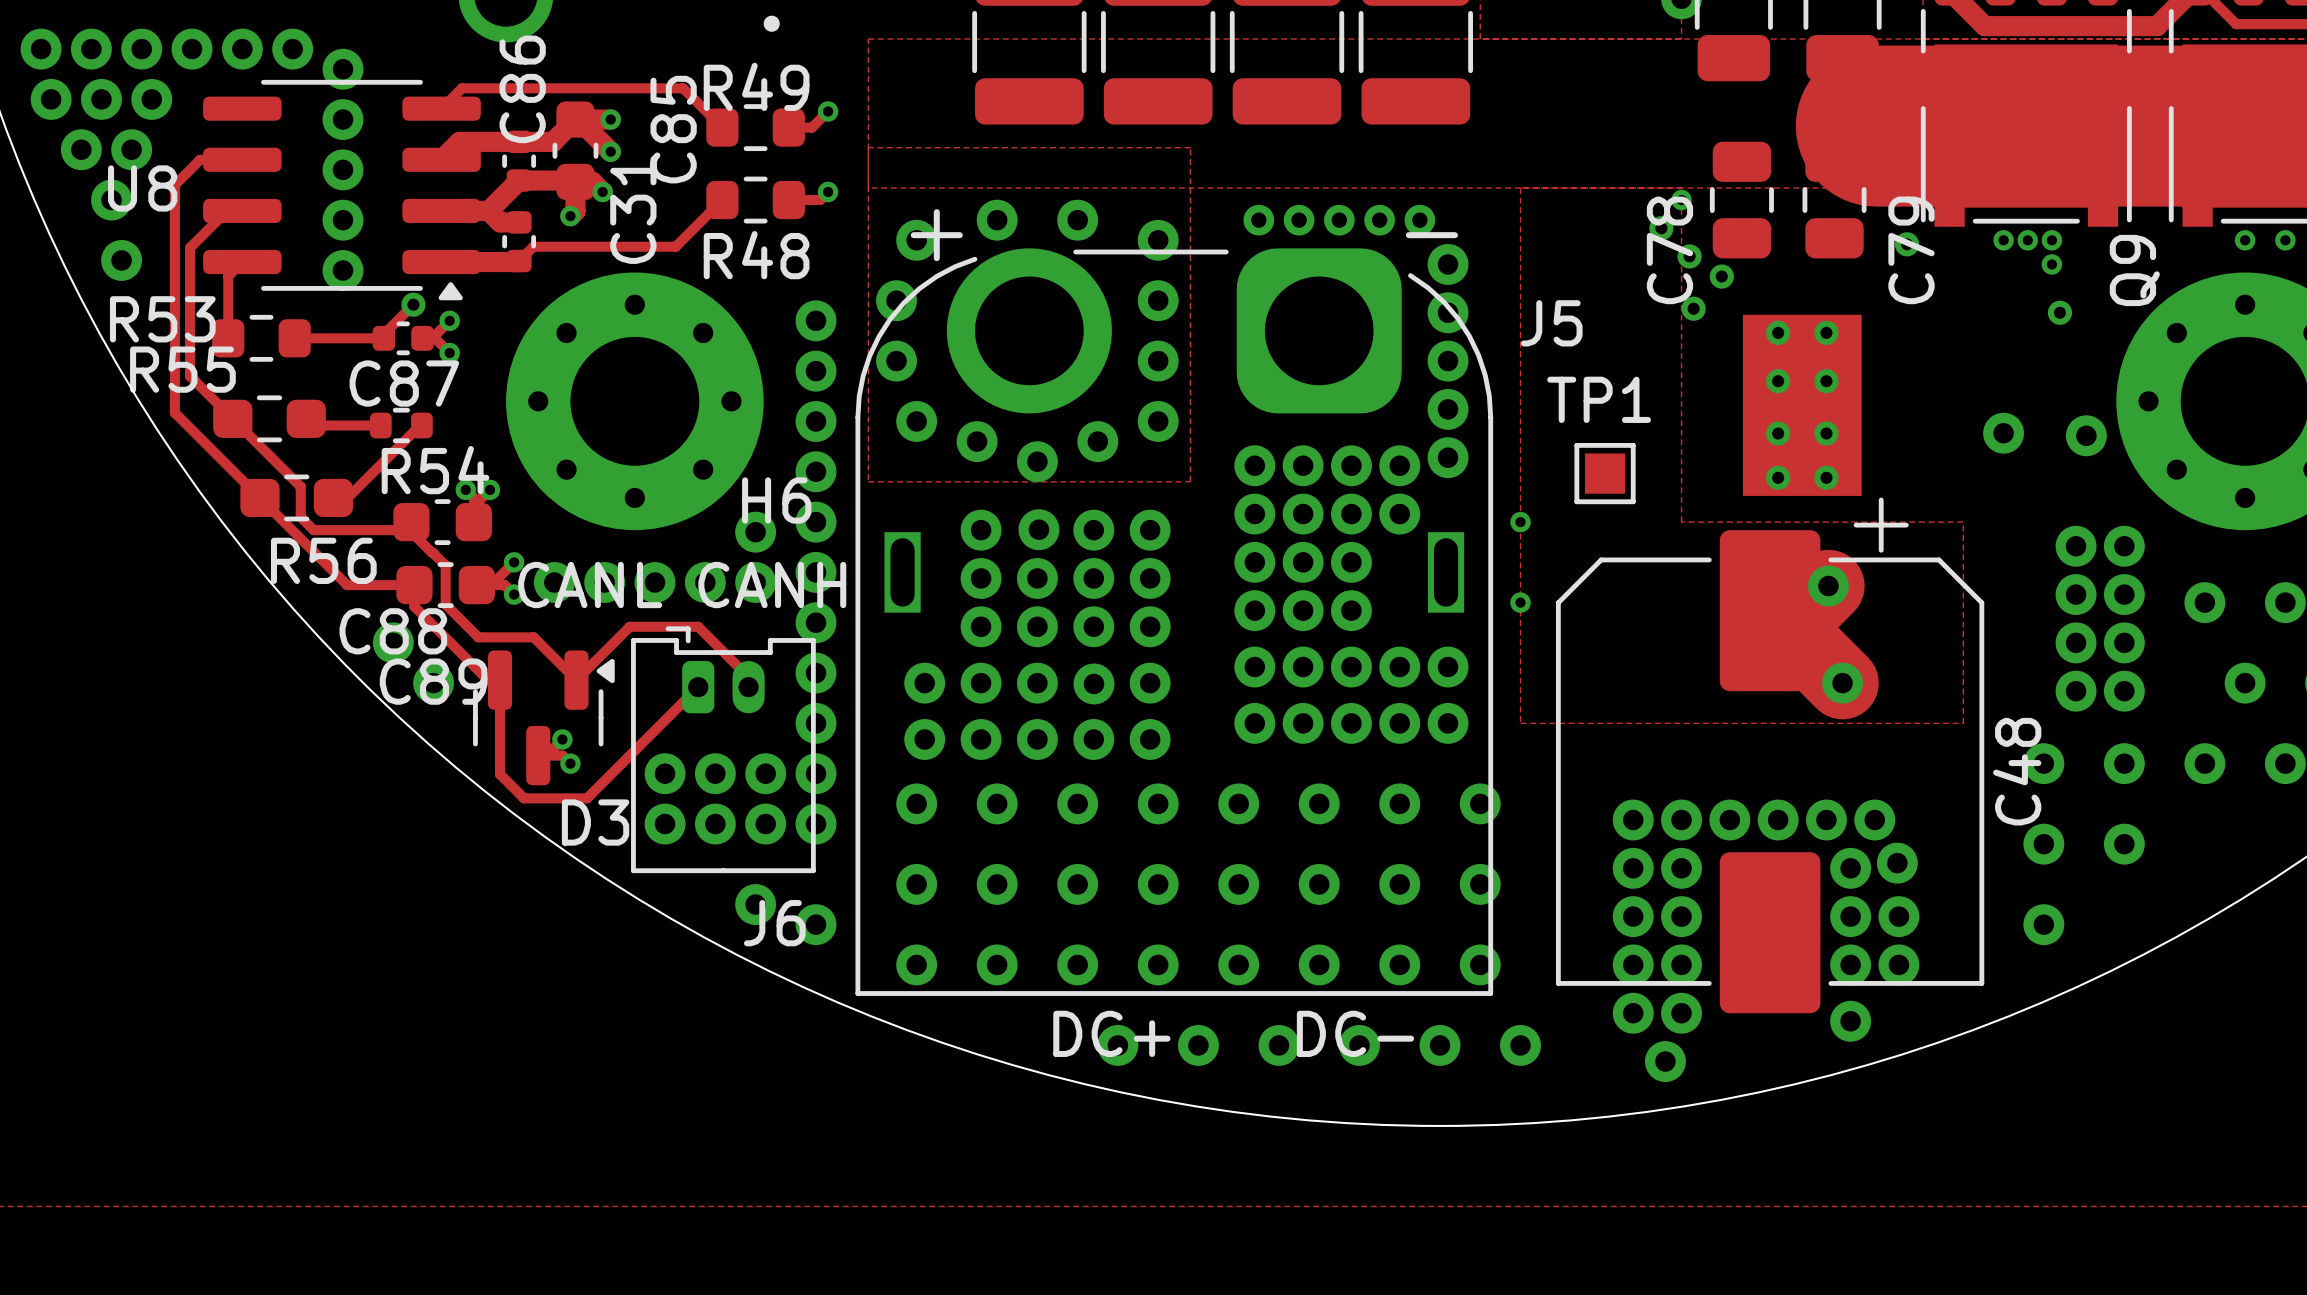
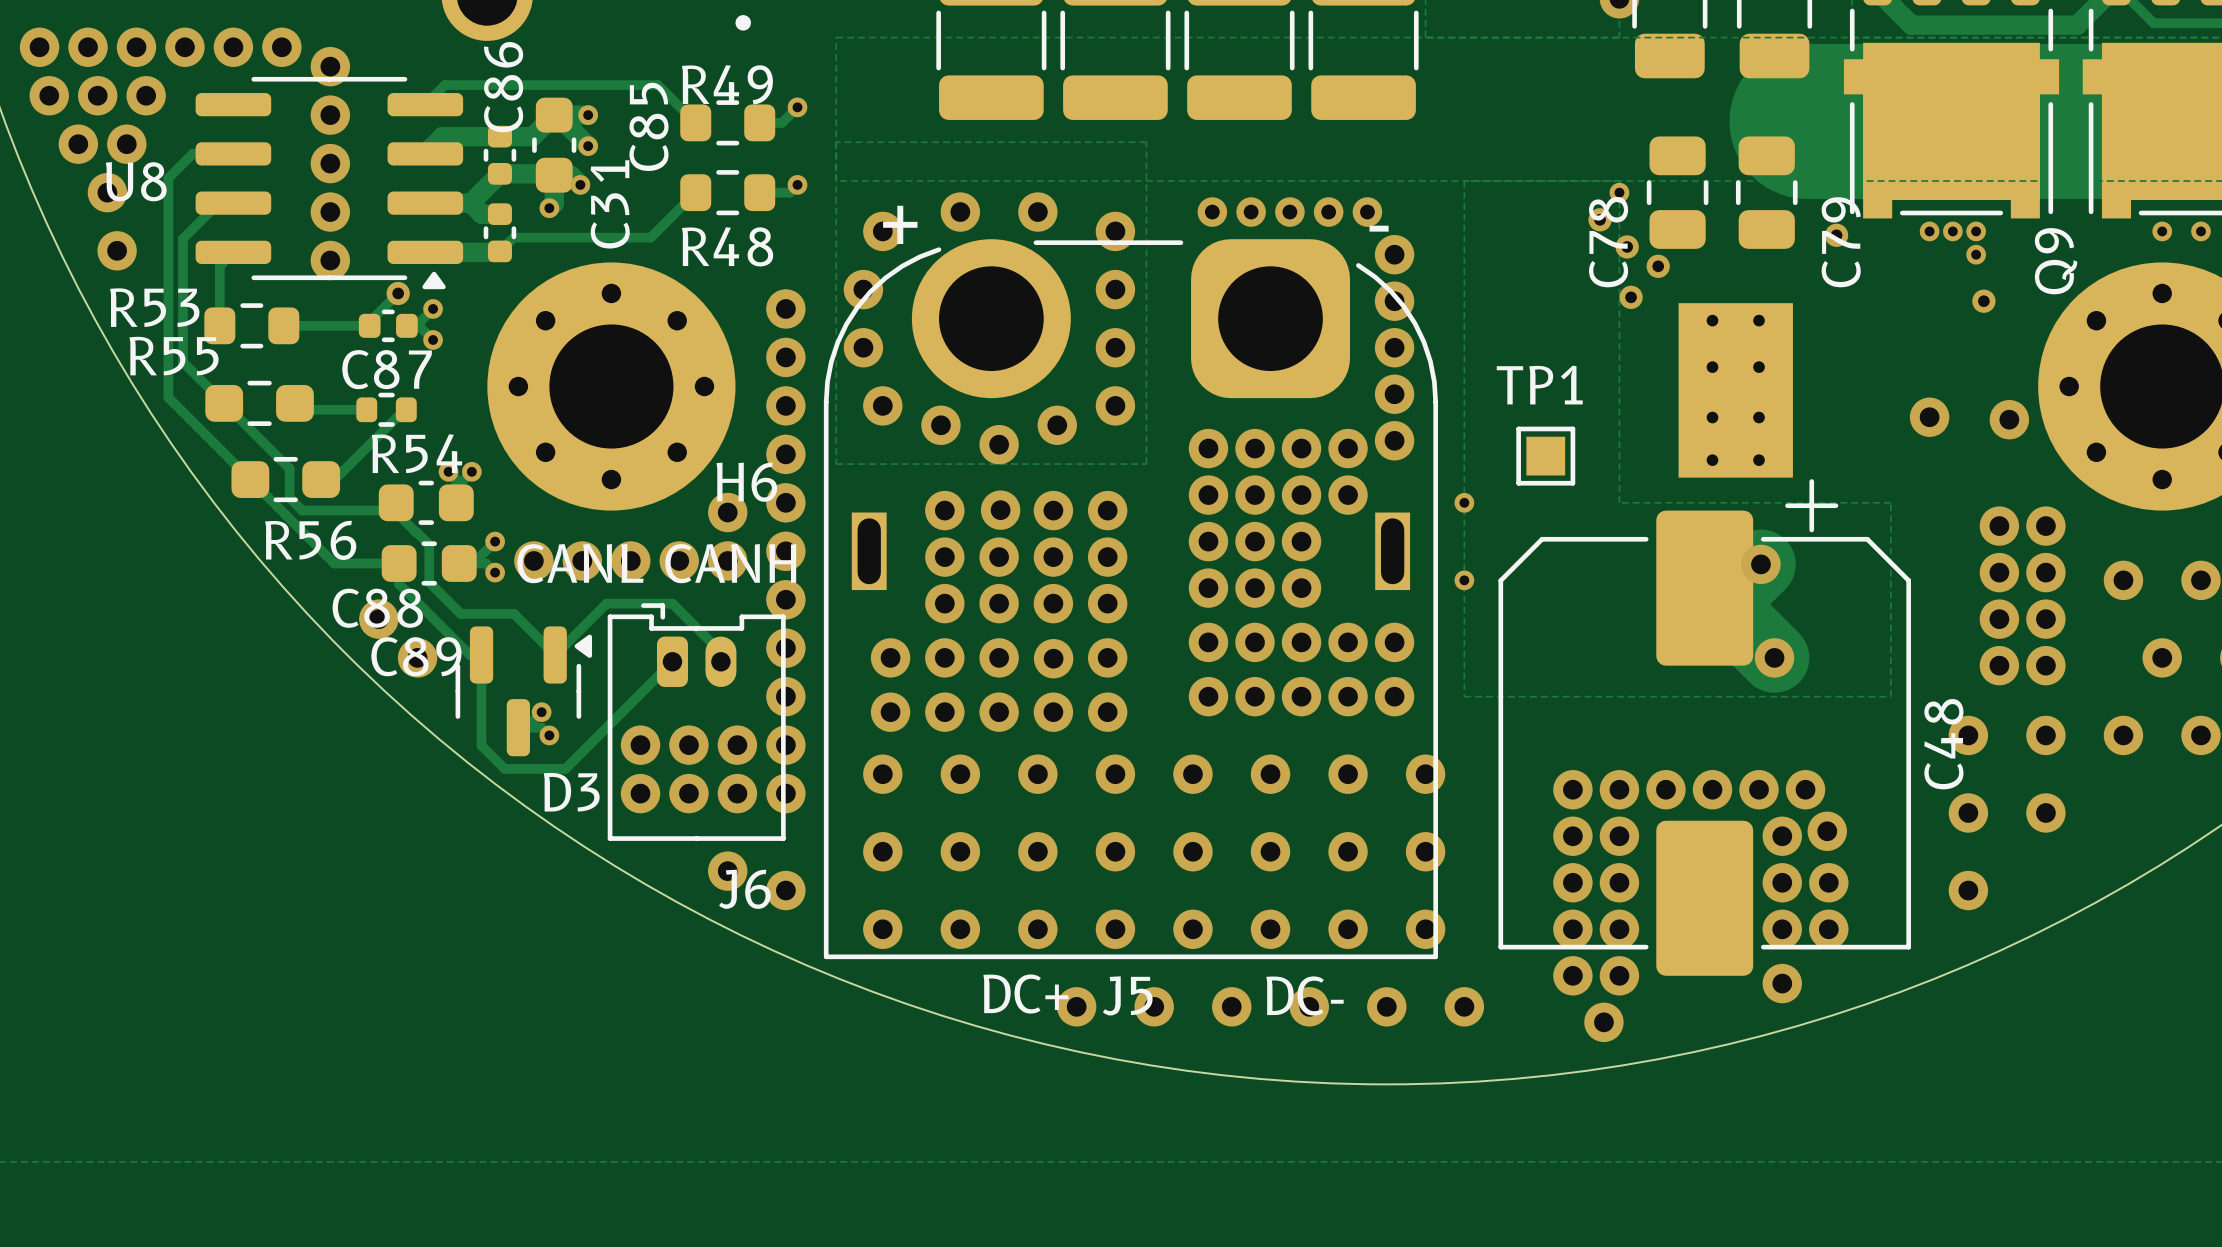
J5 name position: J5 (1551, 323) -> J5 (1127, 995)
text position: DC+ (1111, 1033) -> DC+ (1025, 994)

